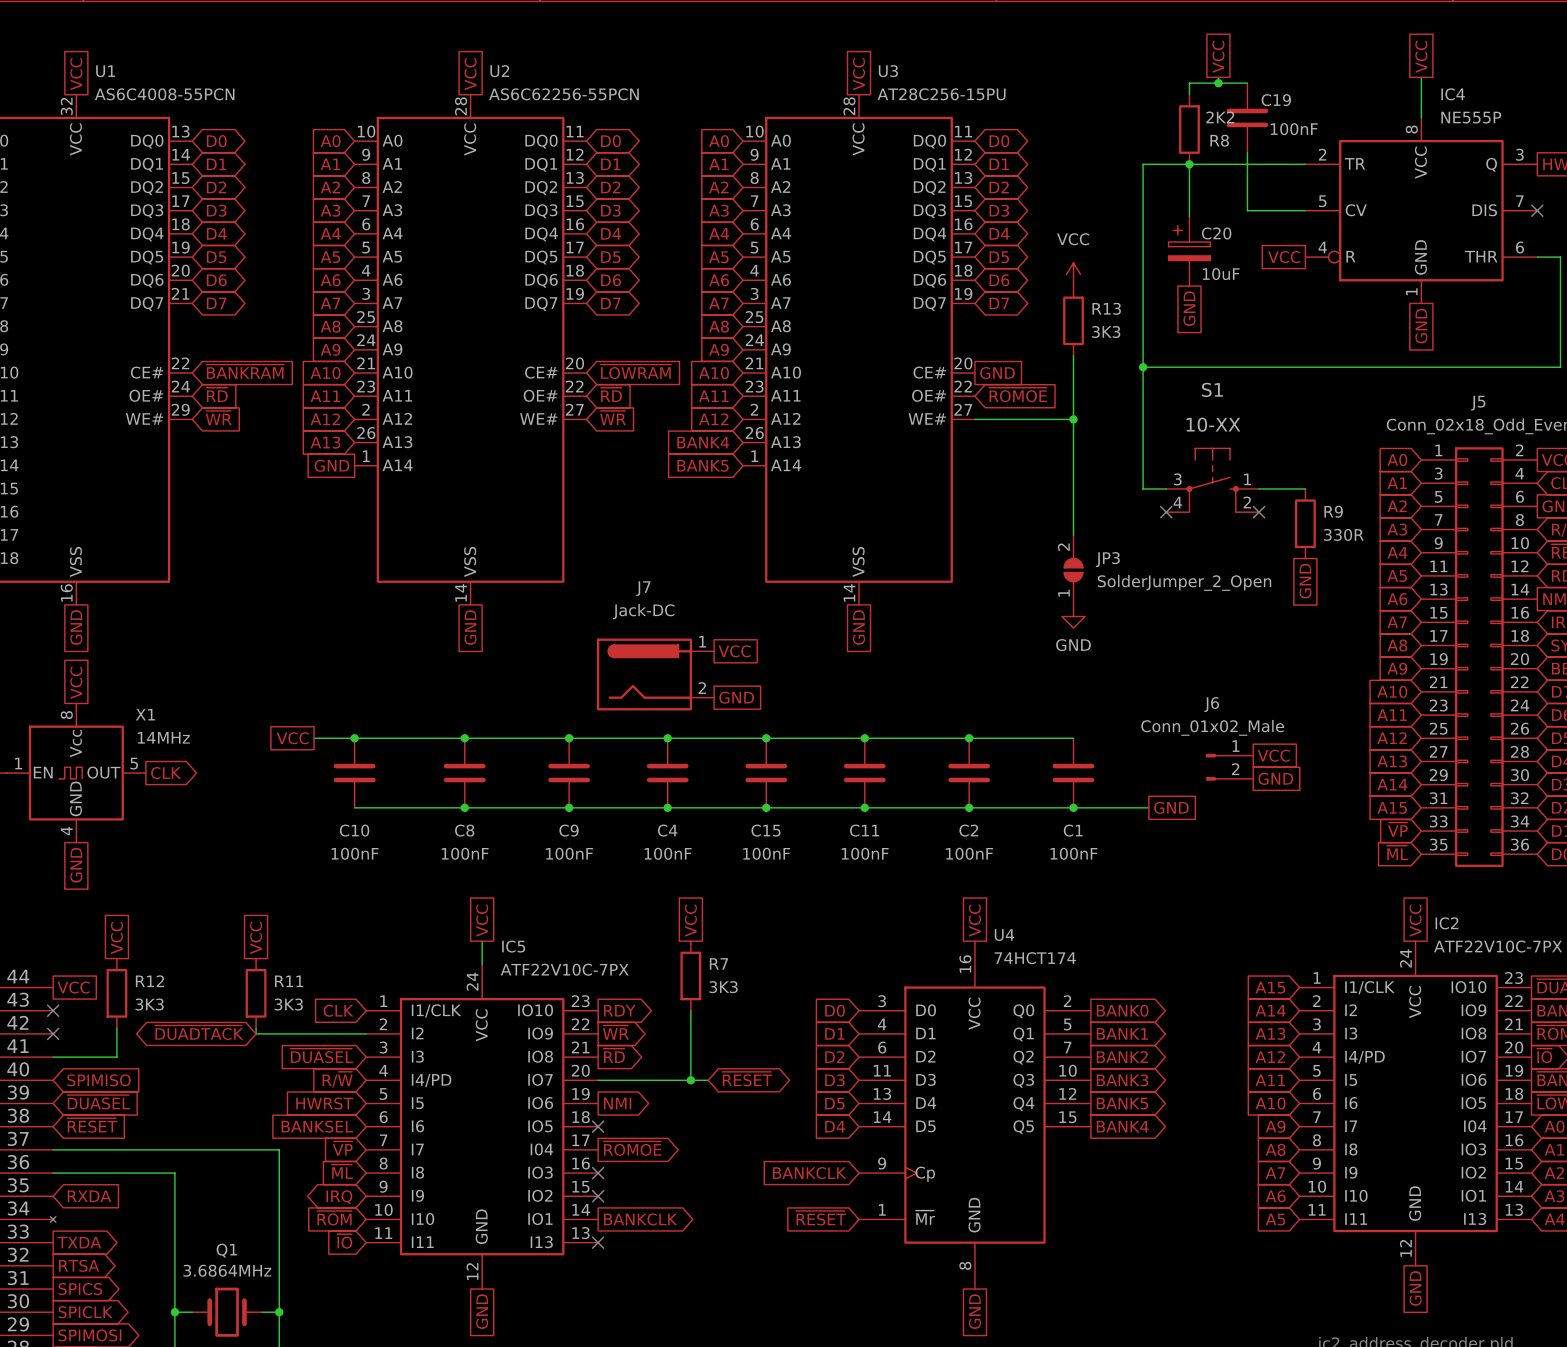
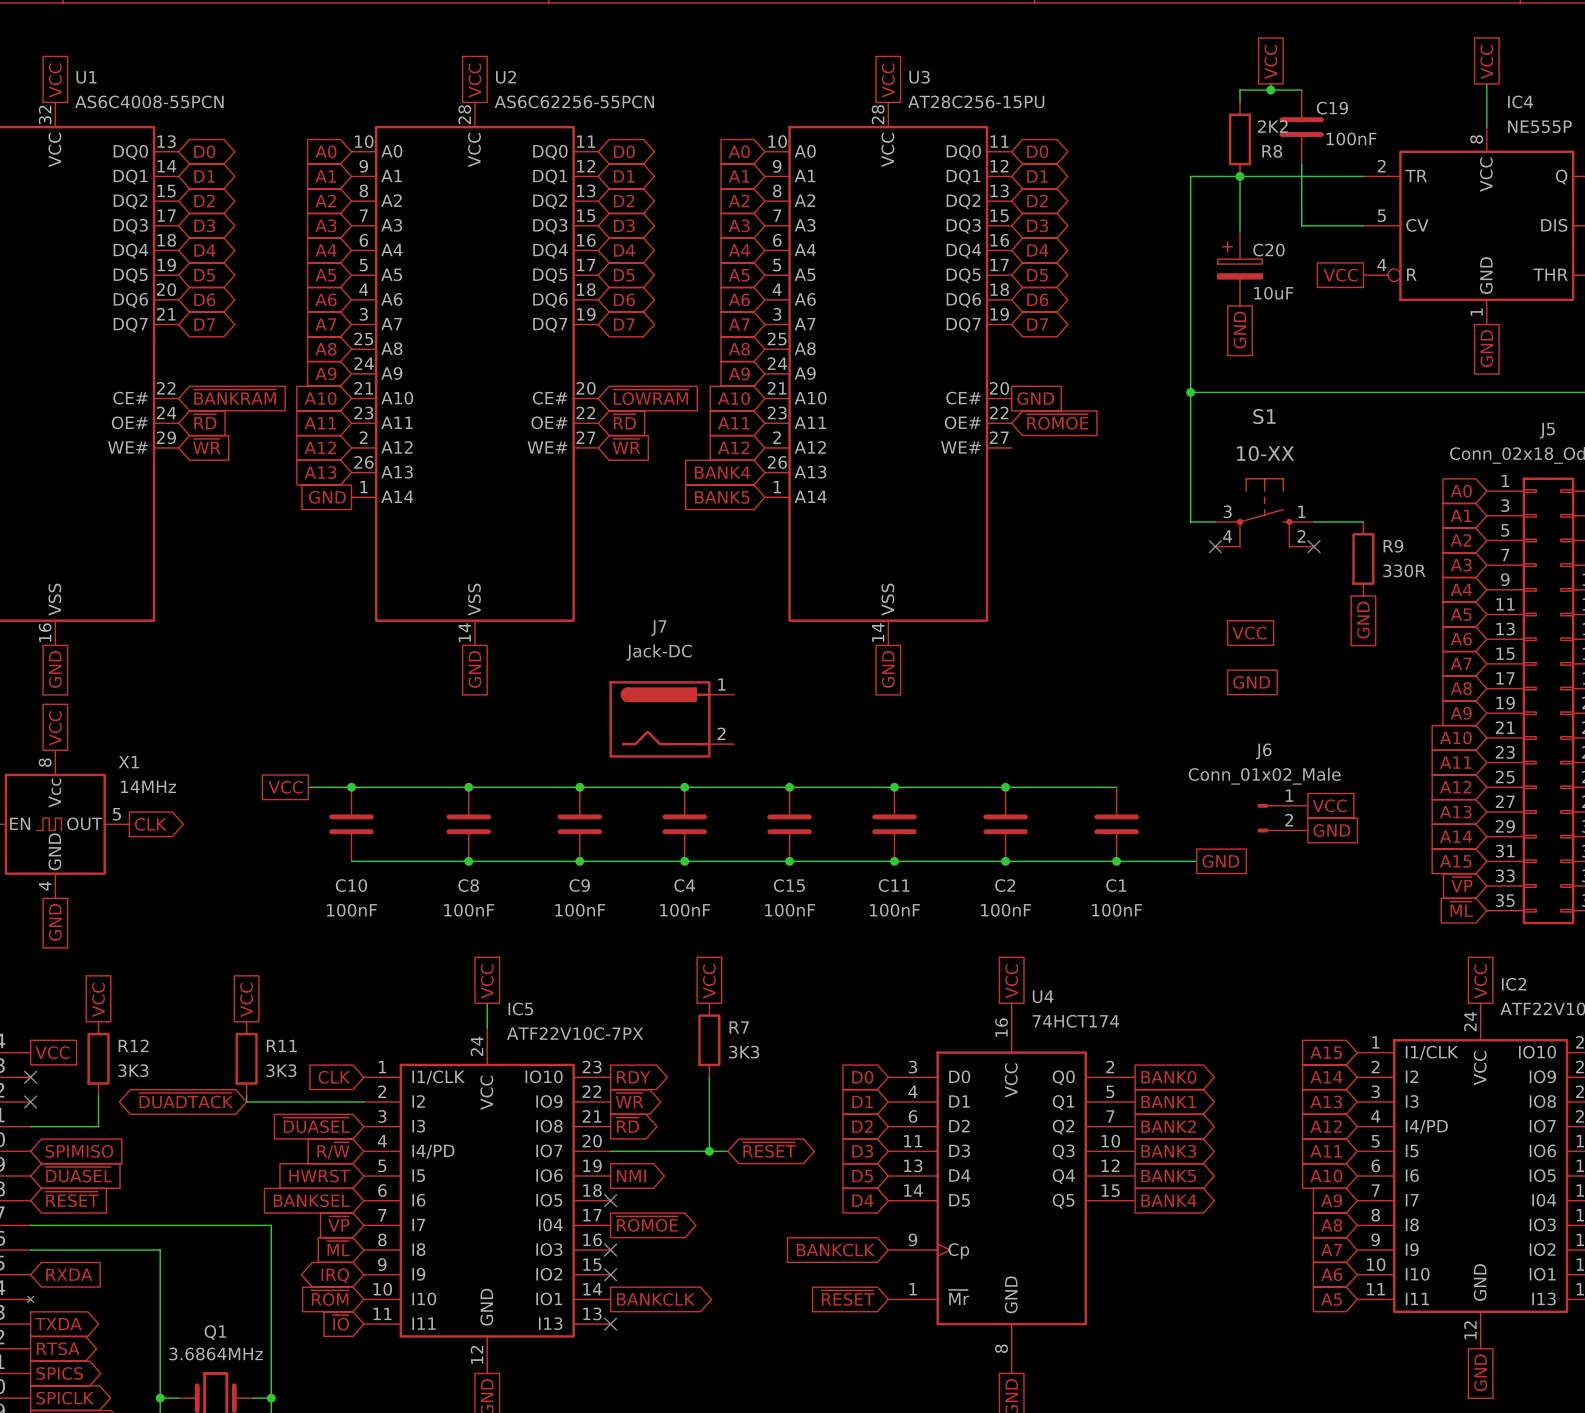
power symbol: VCC (1073, 274) -> none
R13: 3K3 (1073, 320) -> none
wire: (1073, 355) (1073, 535) -> none
wire: (974, 419) (1073, 419) -> none
junction: (1073, 419) -> none
JP3: SolderJumper_2_Open (1073, 570) -> none
global label: none -> VCC (1249, 633)
power symbol: GND (1073, 616) -> none
global label: none -> GND (1251, 682)
global label: VCC (734, 651) -> none
global label: GND (736, 697) -> none

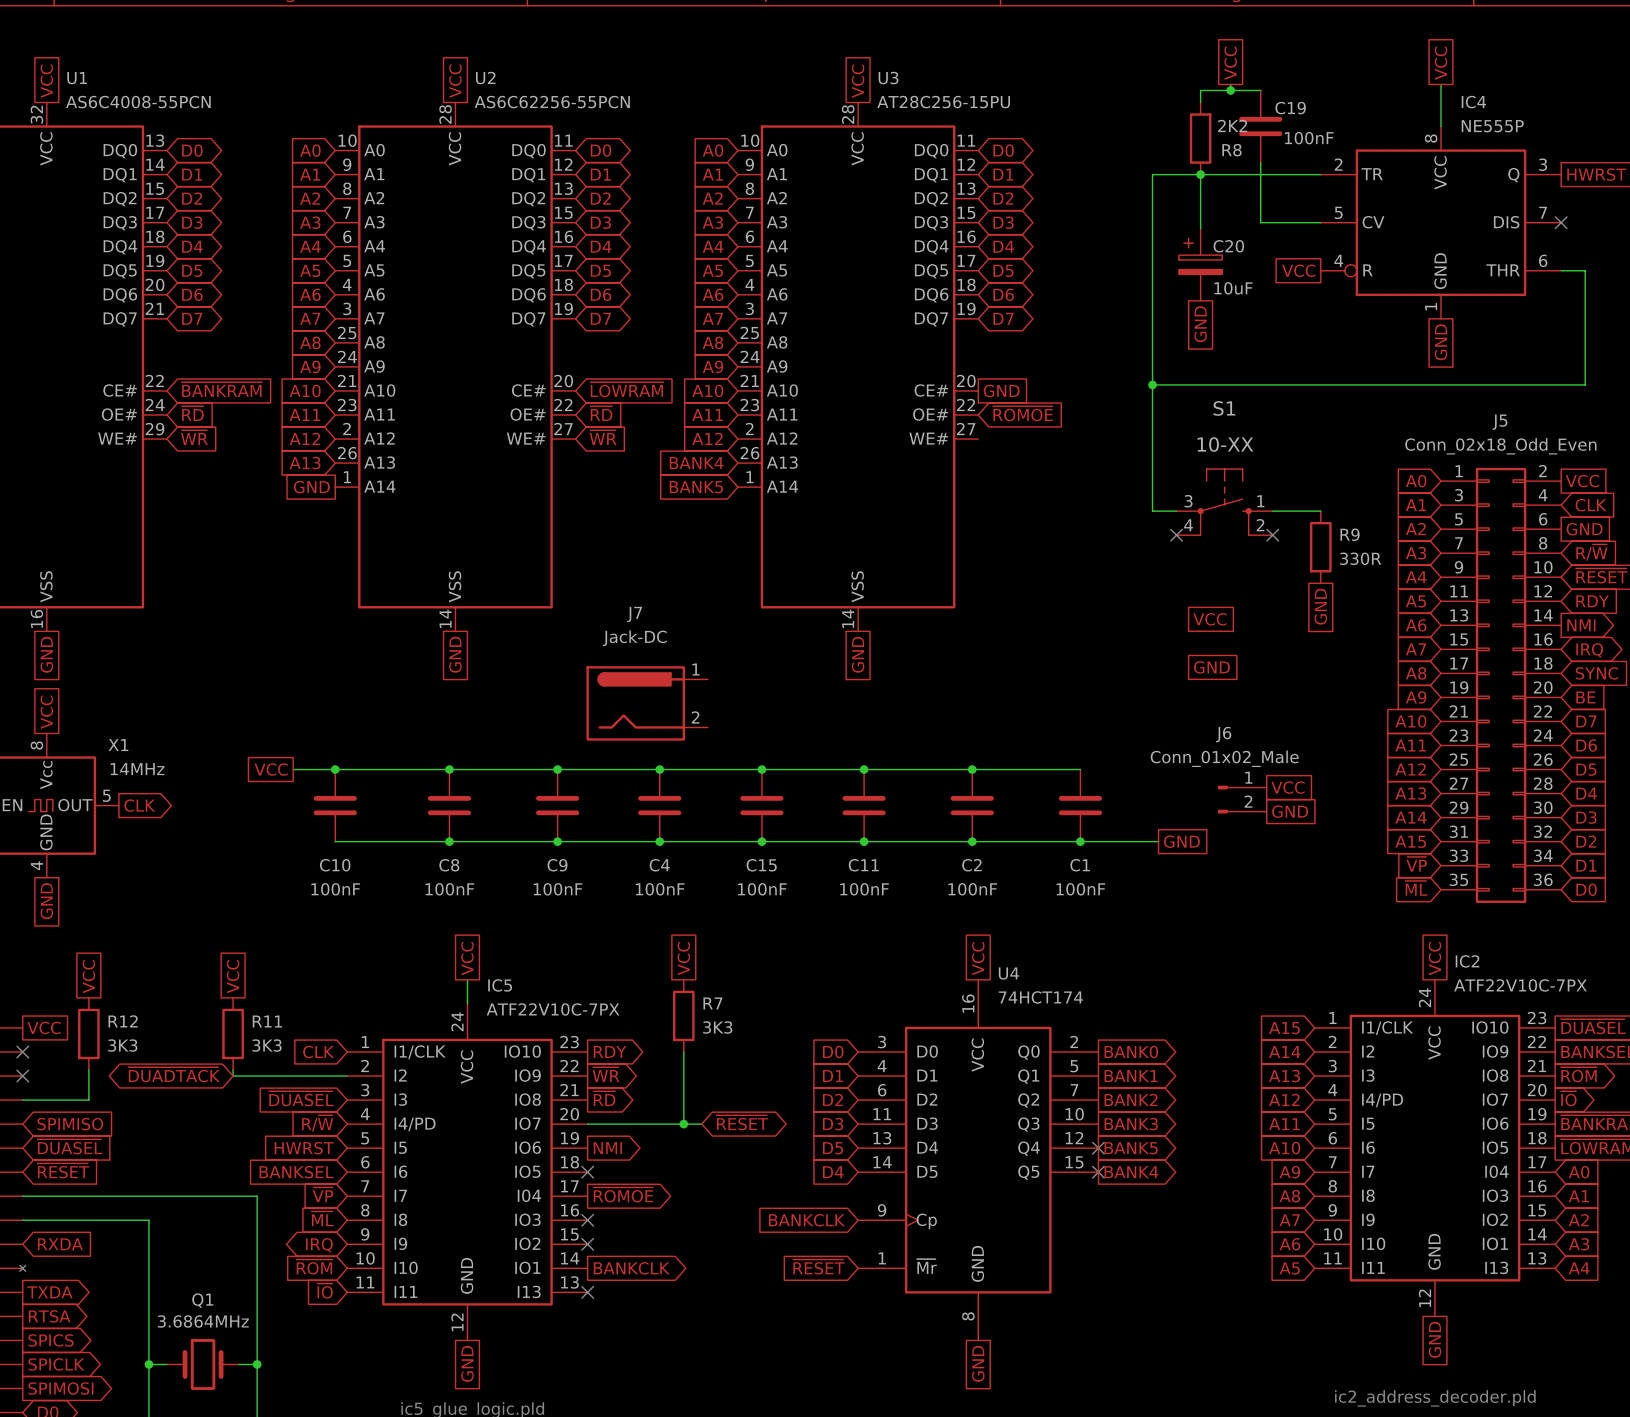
no-connect mark: none -> (1098, 1148)
no-connect mark: none -> (1098, 1172)

